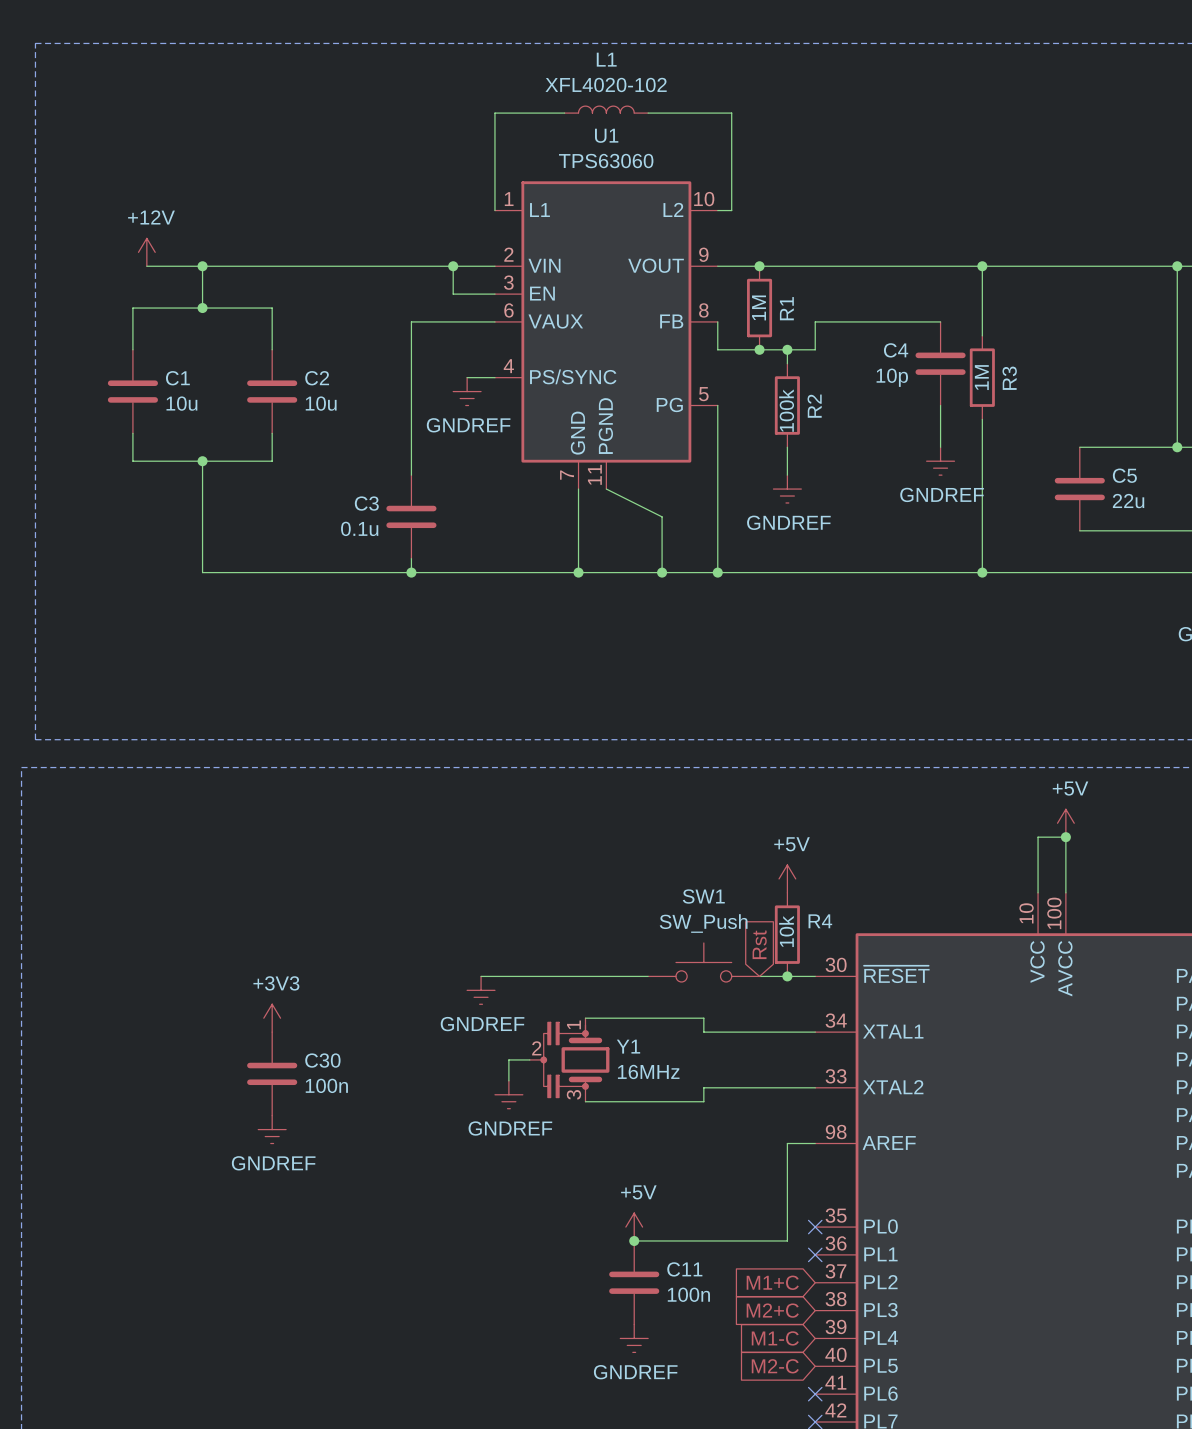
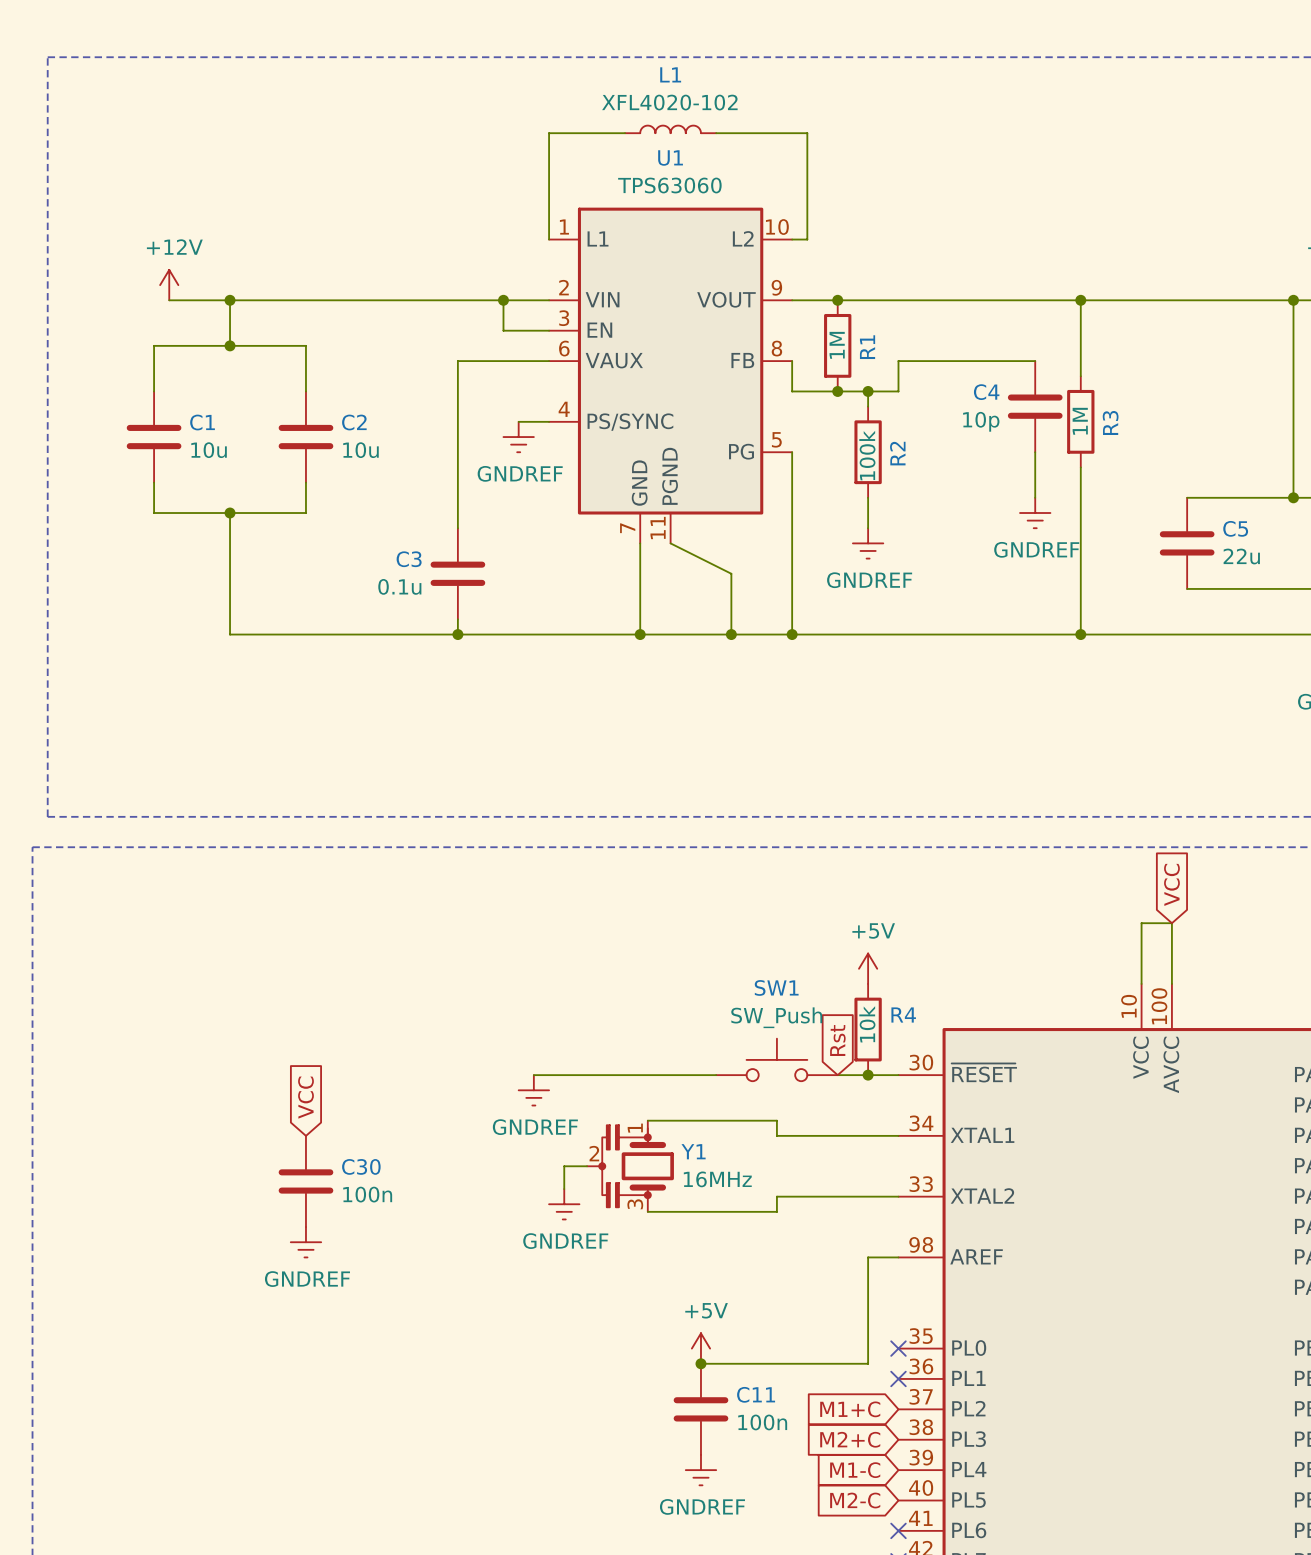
global label: none -> VCC (1171, 884)
power symbol: +5V (1065, 823) -> none
junction: (1065, 837) -> none
global label: none -> VCC (305, 1097)
power symbol: +3V3 (272, 1018) -> none

